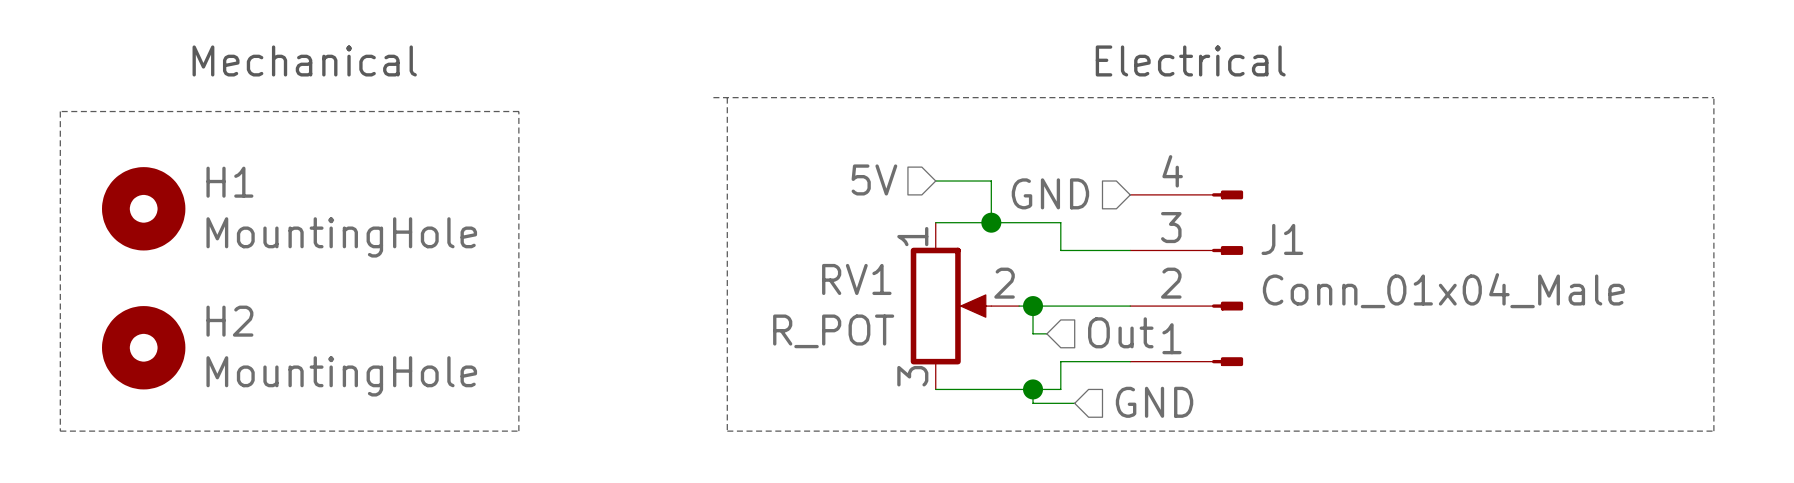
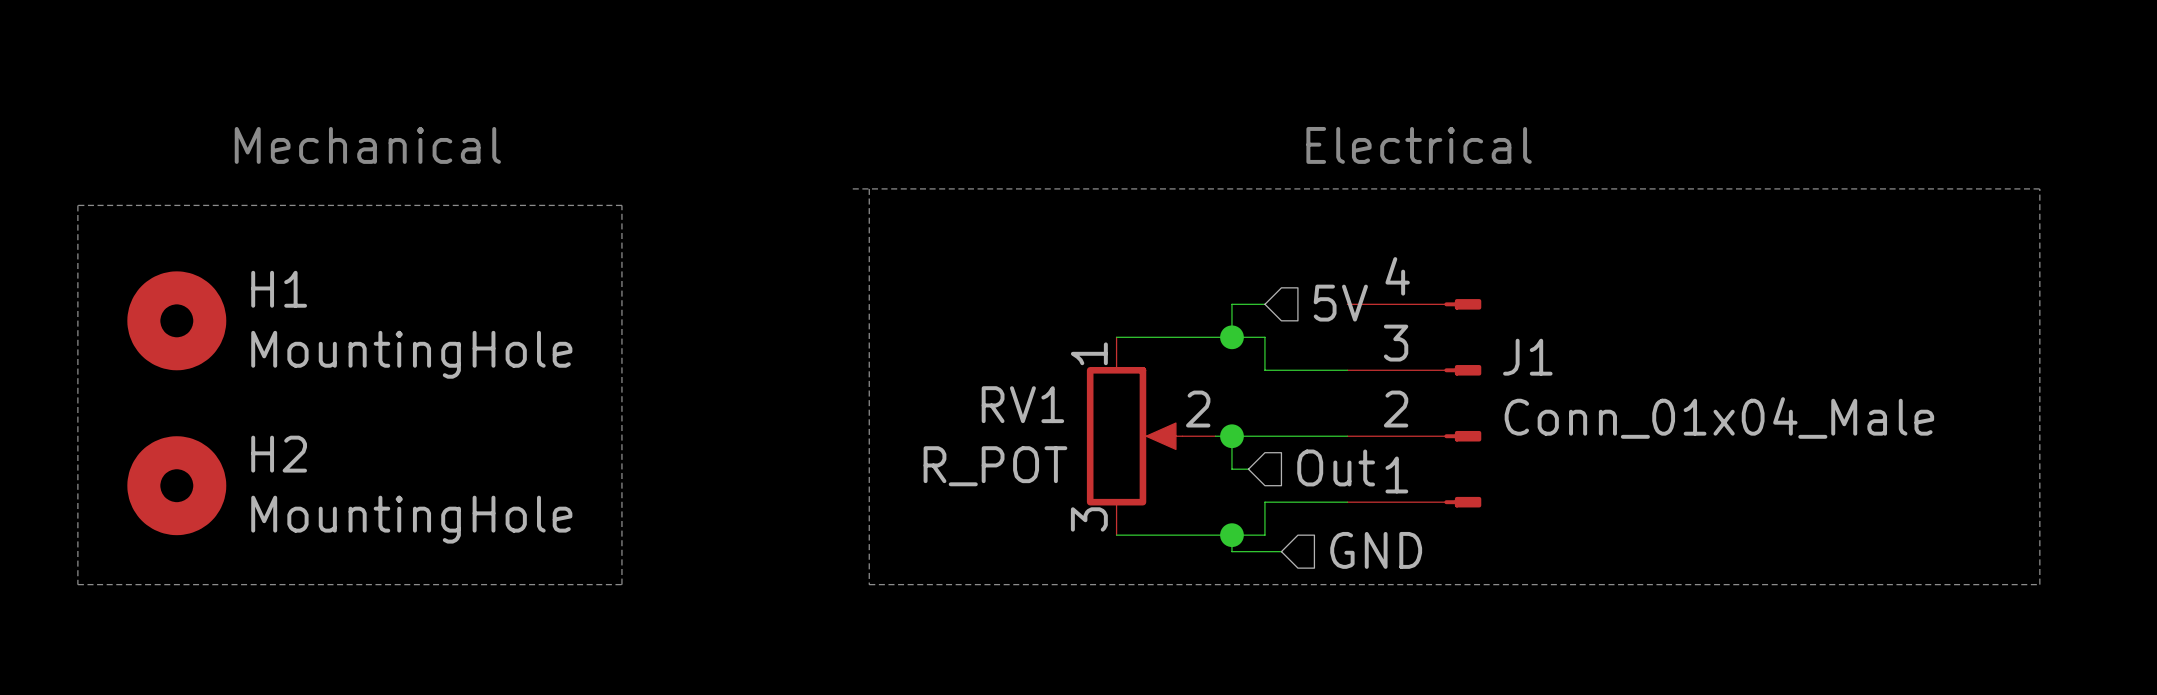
hierarchical label: 5V (874, 179) -> none
wire: (935, 181) (991, 181) (991, 222) -> none
hierarchical label: GND (1050, 193) -> 5V (1340, 303)
wire: none -> (1264, 304) (1231, 304) (1231, 337)
junction position: (991, 222) -> (1231, 337)

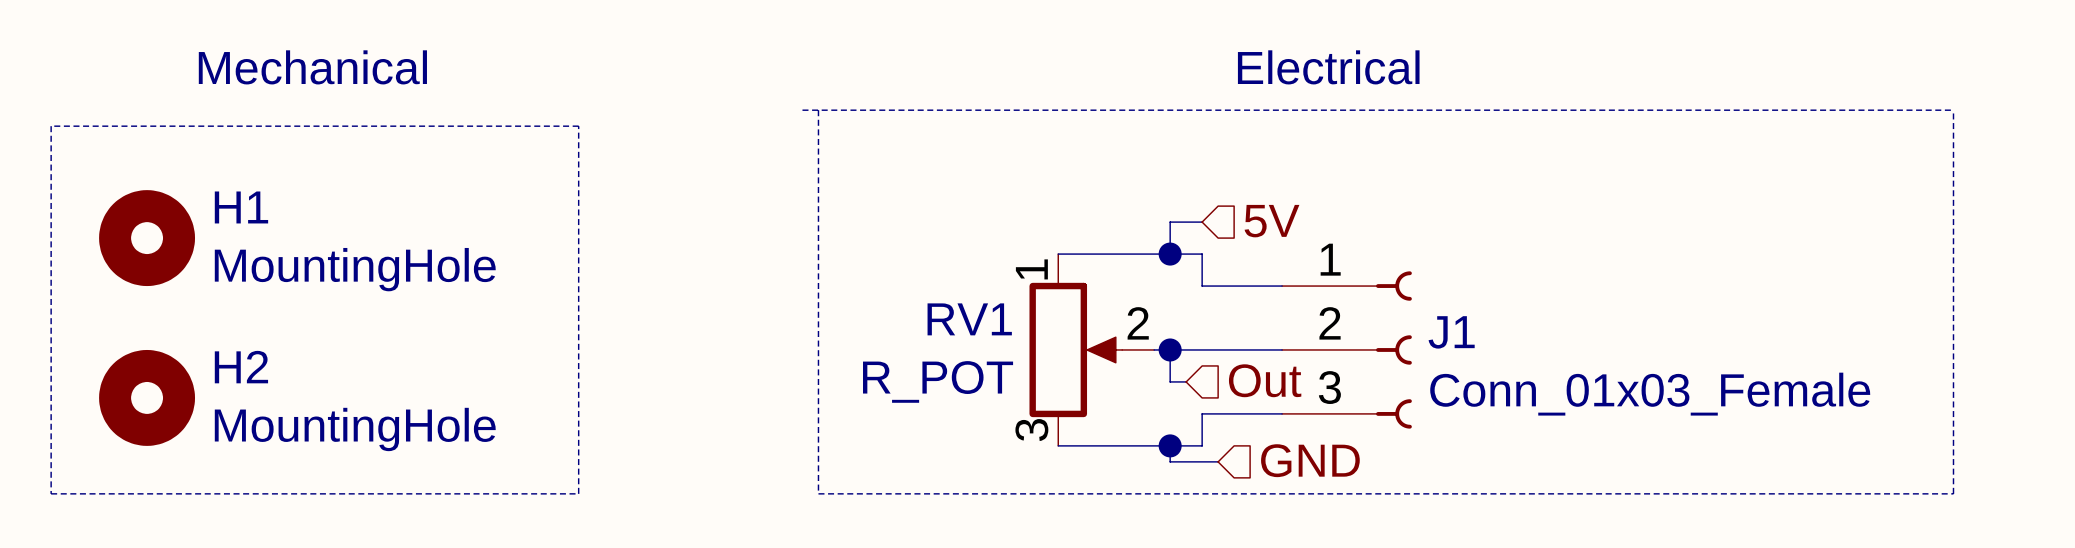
J1 symbol: [1347, 299, 1482, 508] -> [1282, 271, 1412, 429]
J1 value: Conn_01x04_Male (1719, 417) -> Conn_01x03_Female (1650, 394)

